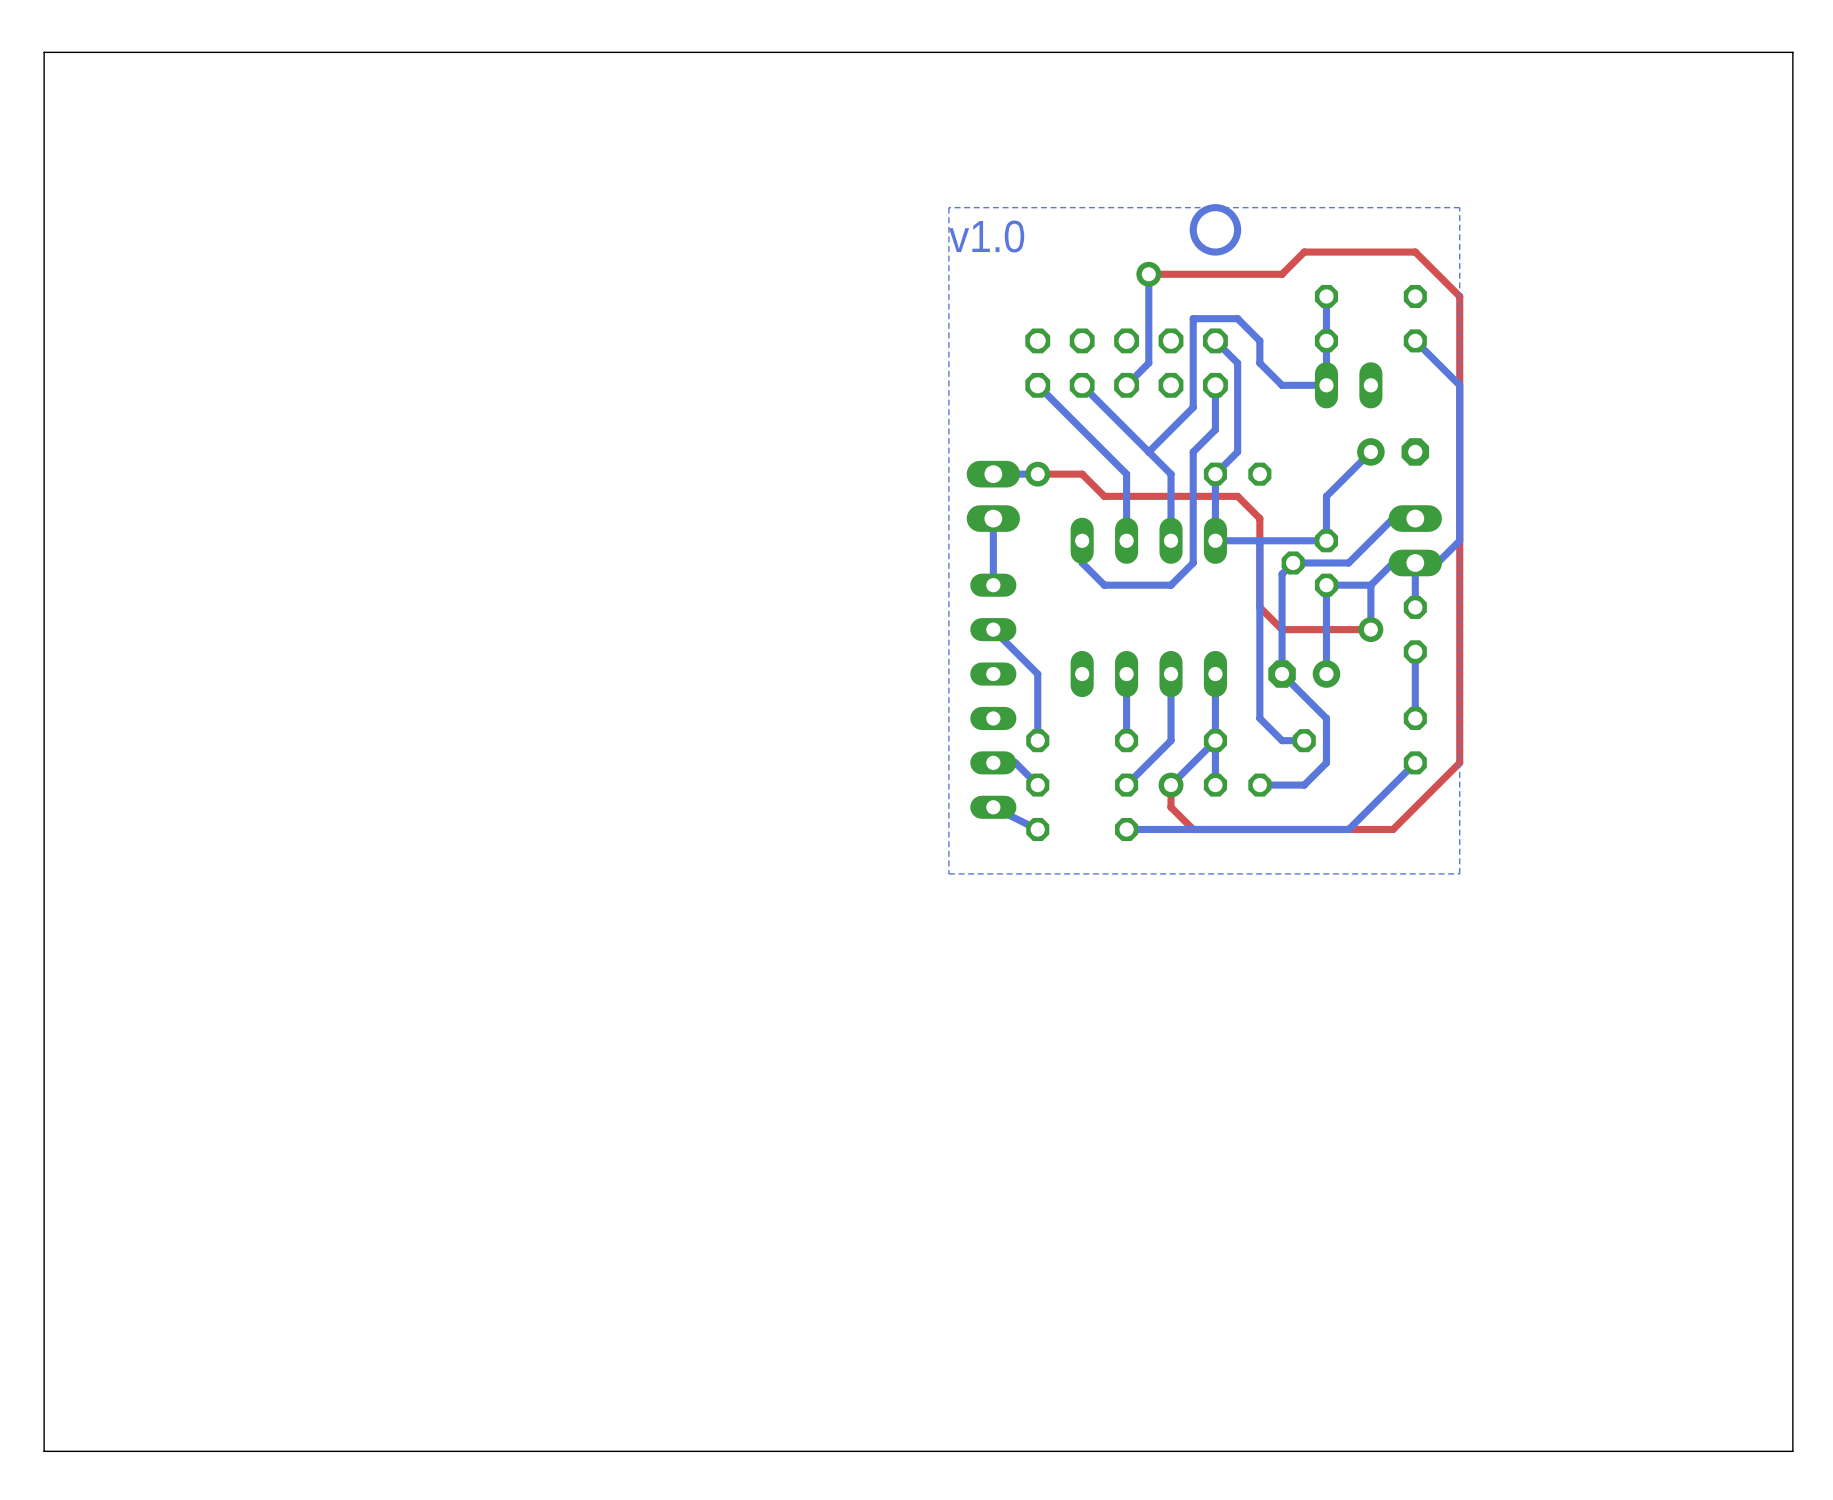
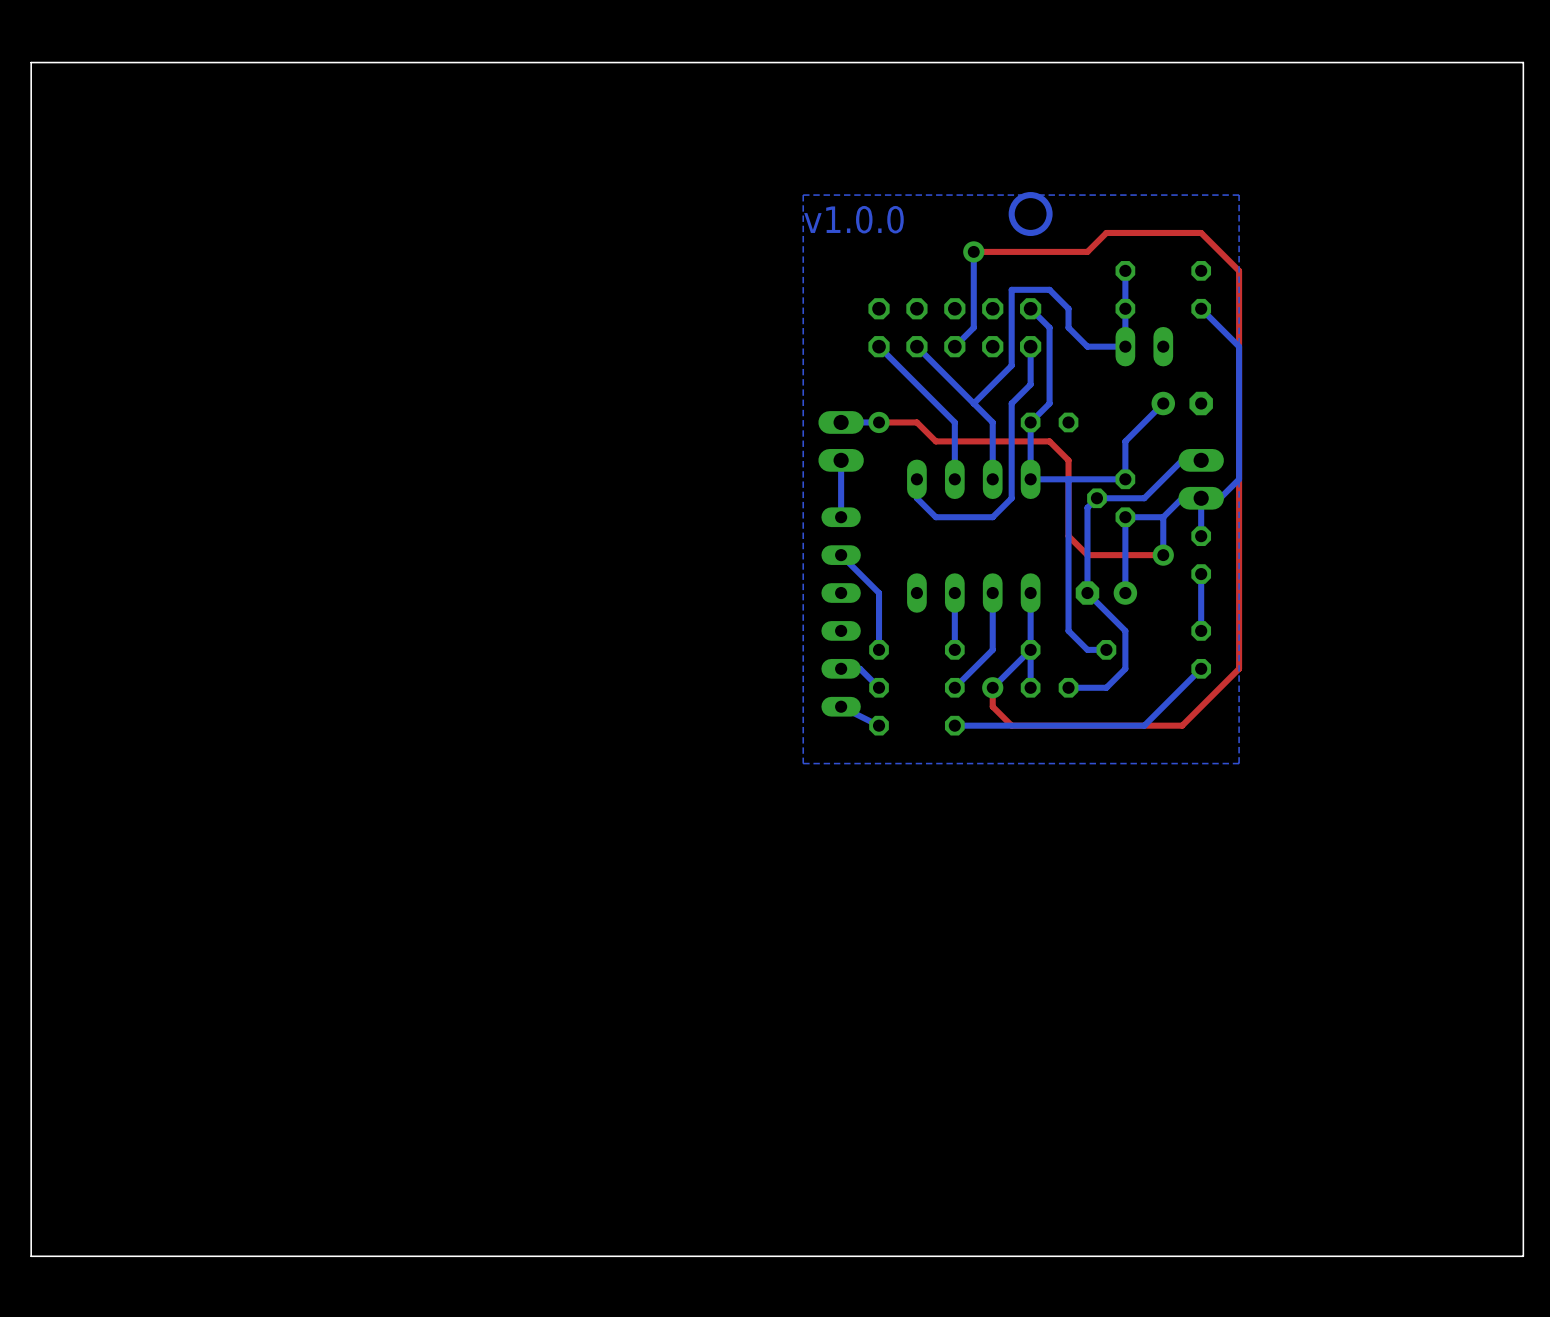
text: v1.0 (986, 236) -> v1.0.0 (853, 219)

